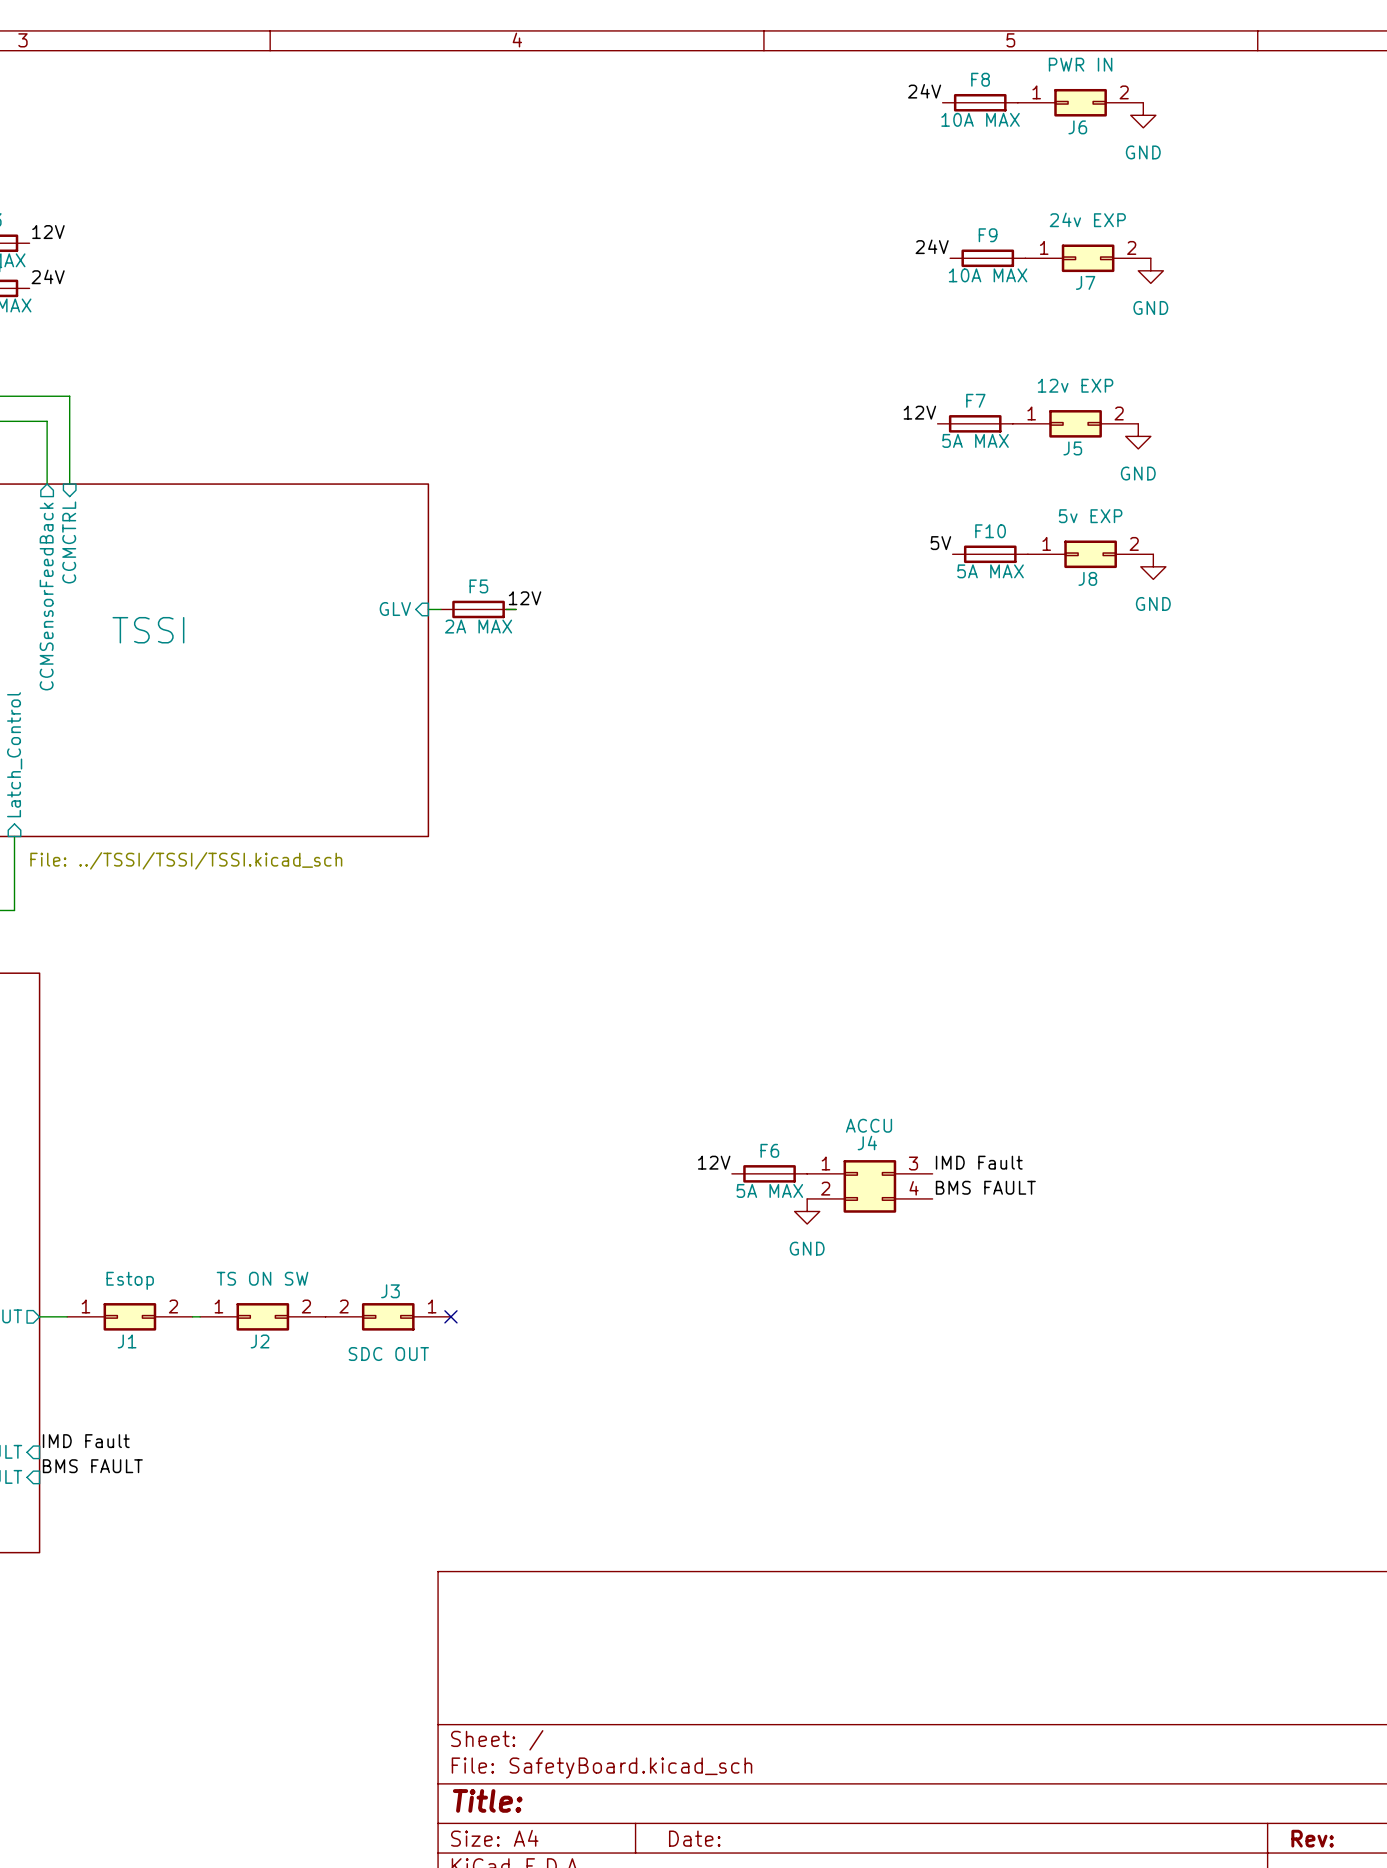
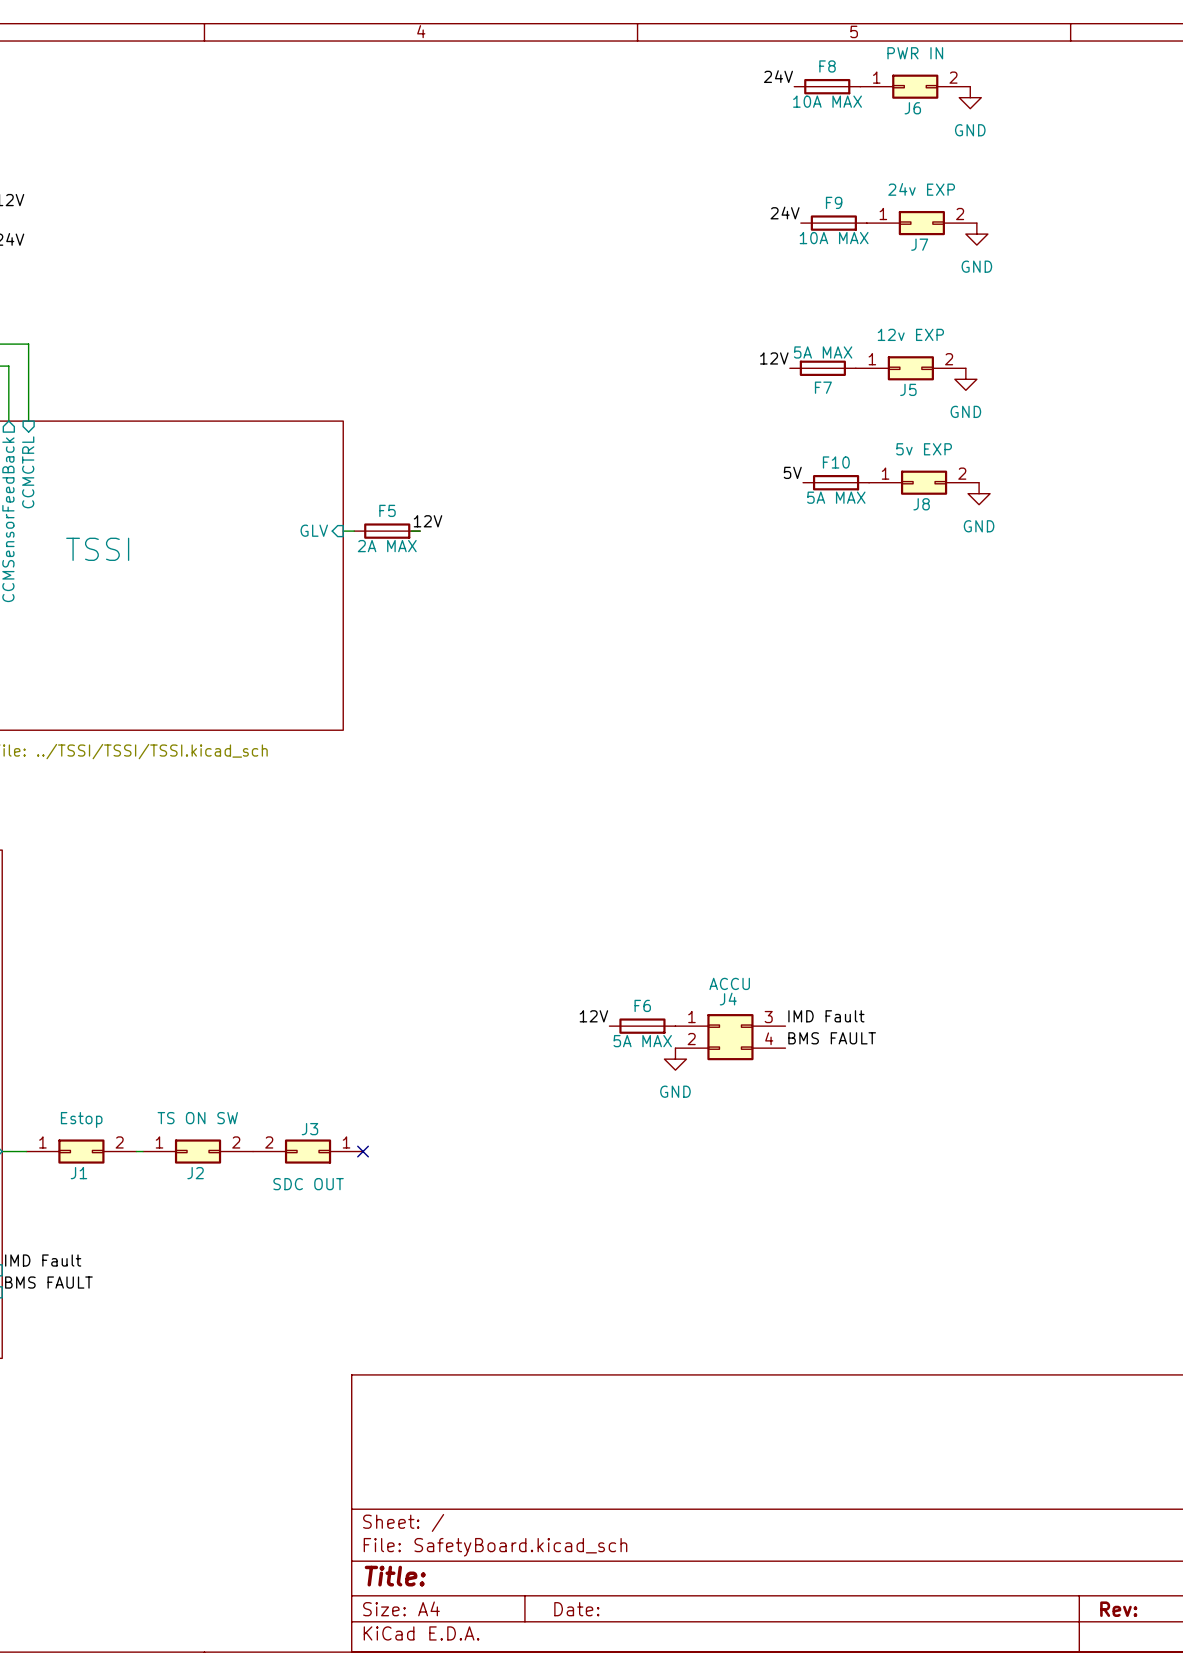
F7 name position: F7 (975, 400) -> F7 (823, 387)
F7 value position: 5A MAX (975, 440) -> 5A MAX (823, 352)

